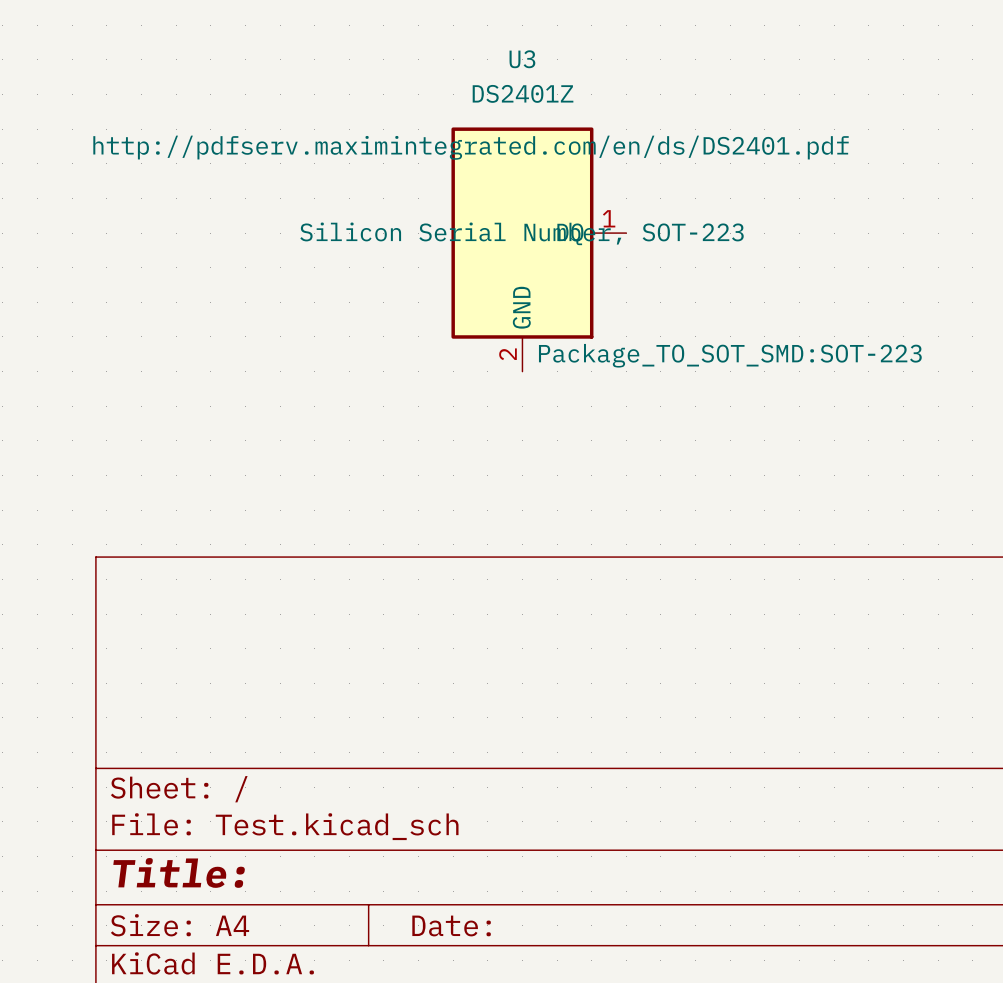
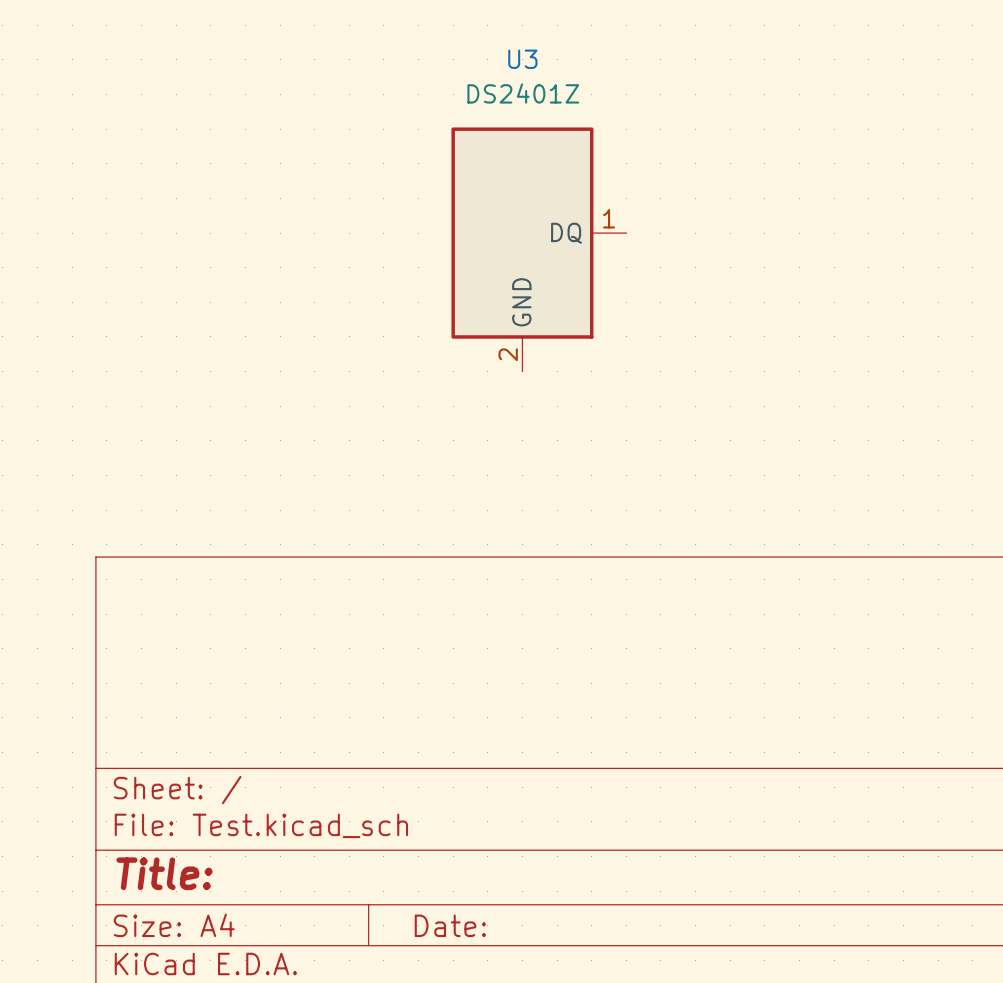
U3 text: http://pdfserv.maximintegrated.com/en/ds/DS2401.pdf (471, 147) -> none
U3 text: Silicon Serial Number, SOT-223 (521, 233) -> none
U3 text: Package_TO_SOT_SMD:SOT-223 (730, 355) -> none

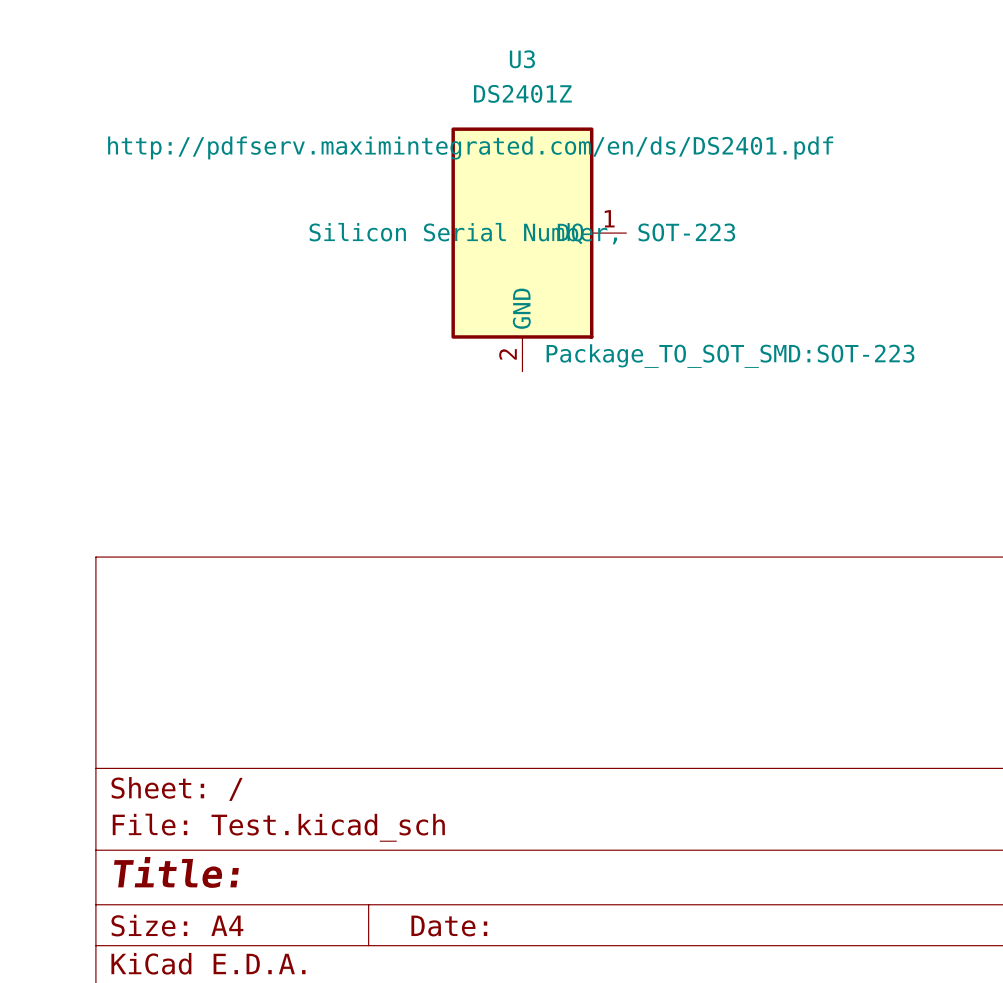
U3 text: none -> http://pdfserv.maximintegrated.com/en/ds/DS2401.pdf (470, 148)
U3 text: none -> Silicon Serial Number, SOT-223 (522, 233)
U3 text: none -> Package_TO_SOT_SMD:SOT-223 (730, 356)

